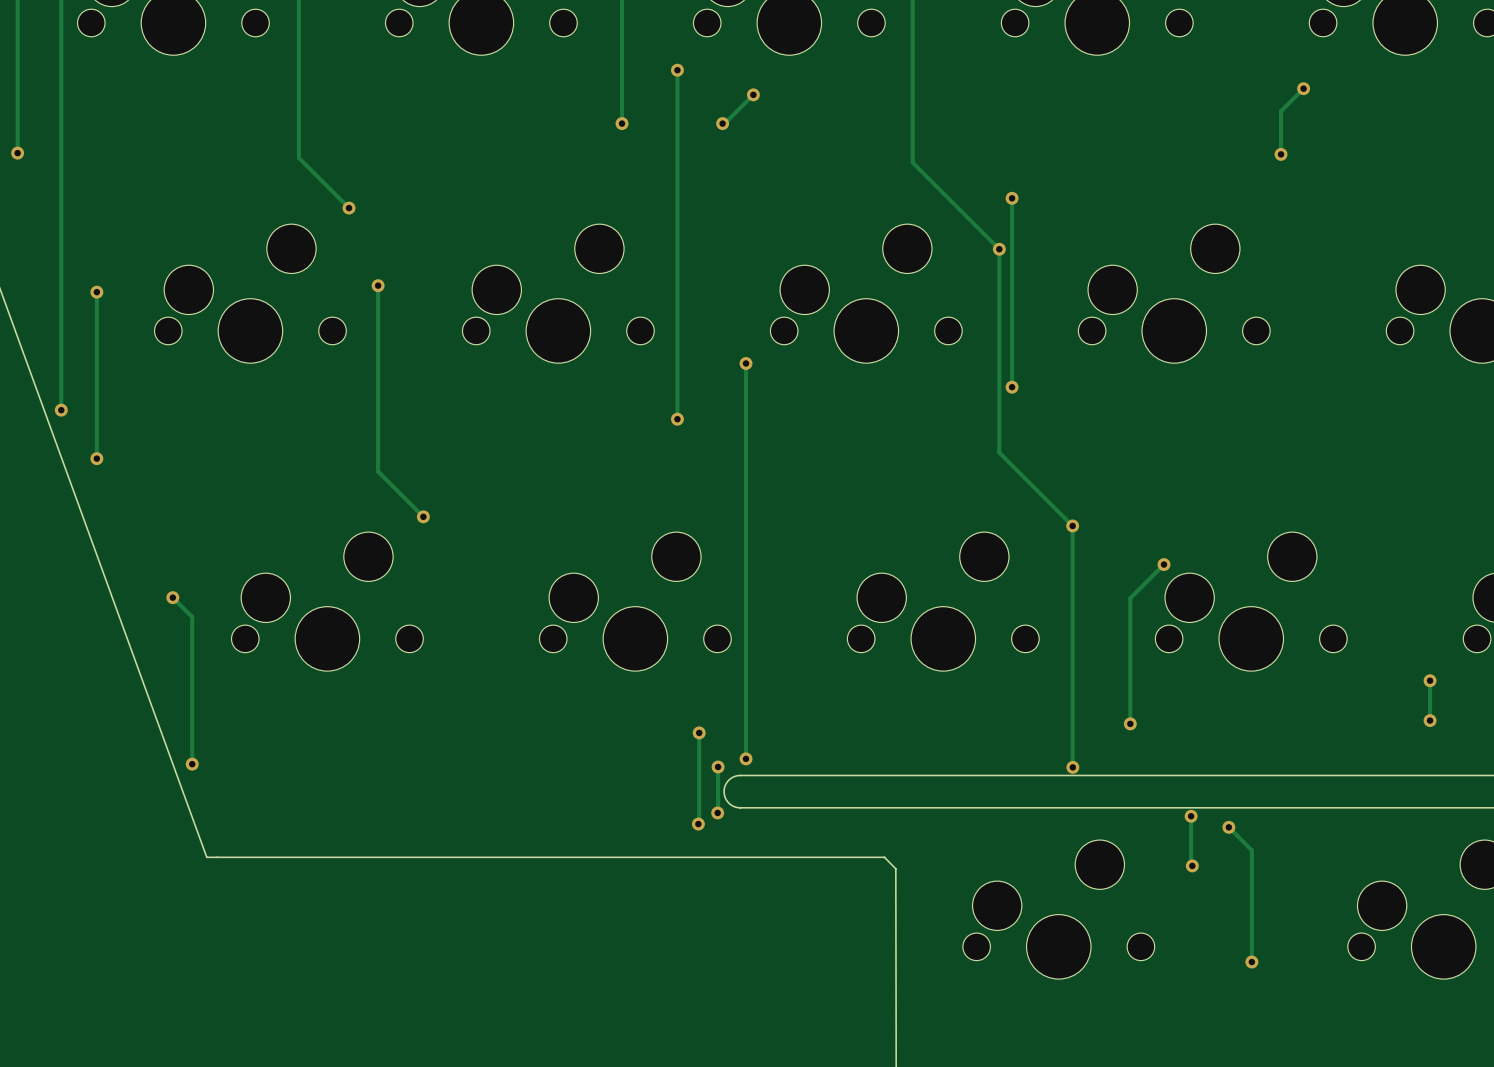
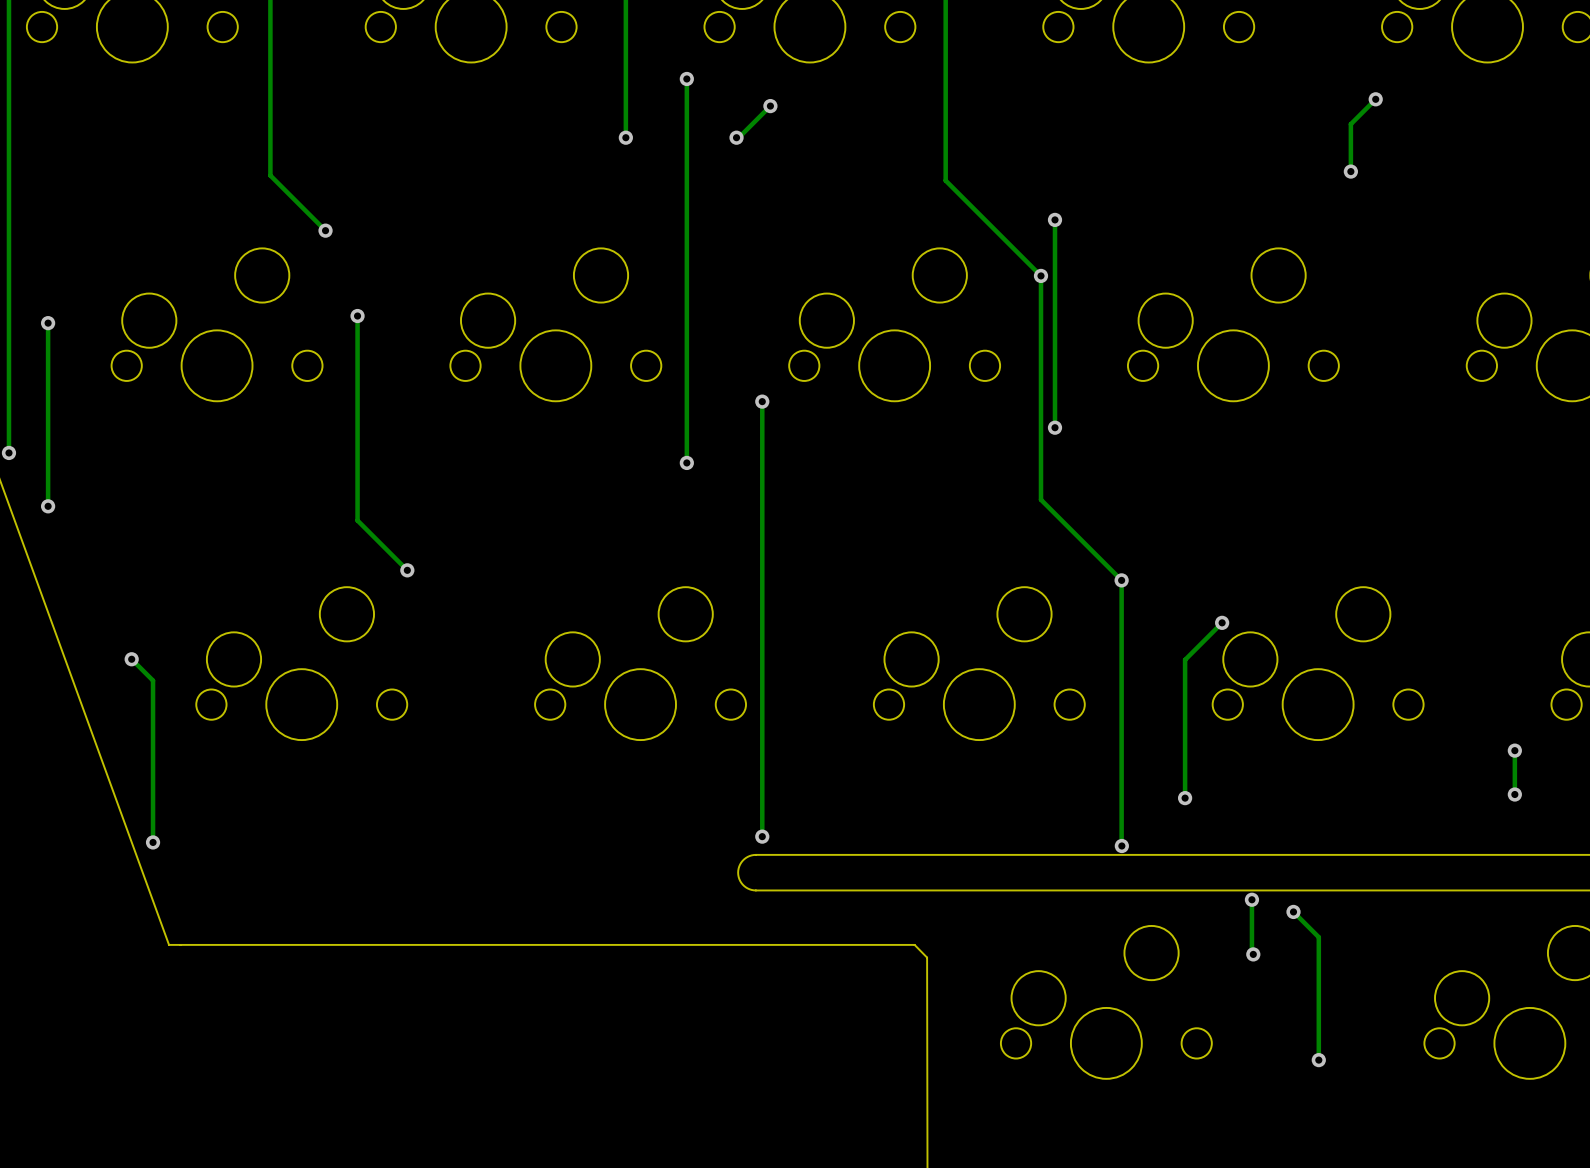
track: (699, 732) (698, 824) -> none
via: (699, 732) -> none
track: (718, 766) (717, 812) -> none
via: (718, 766) -> none
via: (717, 812) -> none
via: (698, 824) -> none

